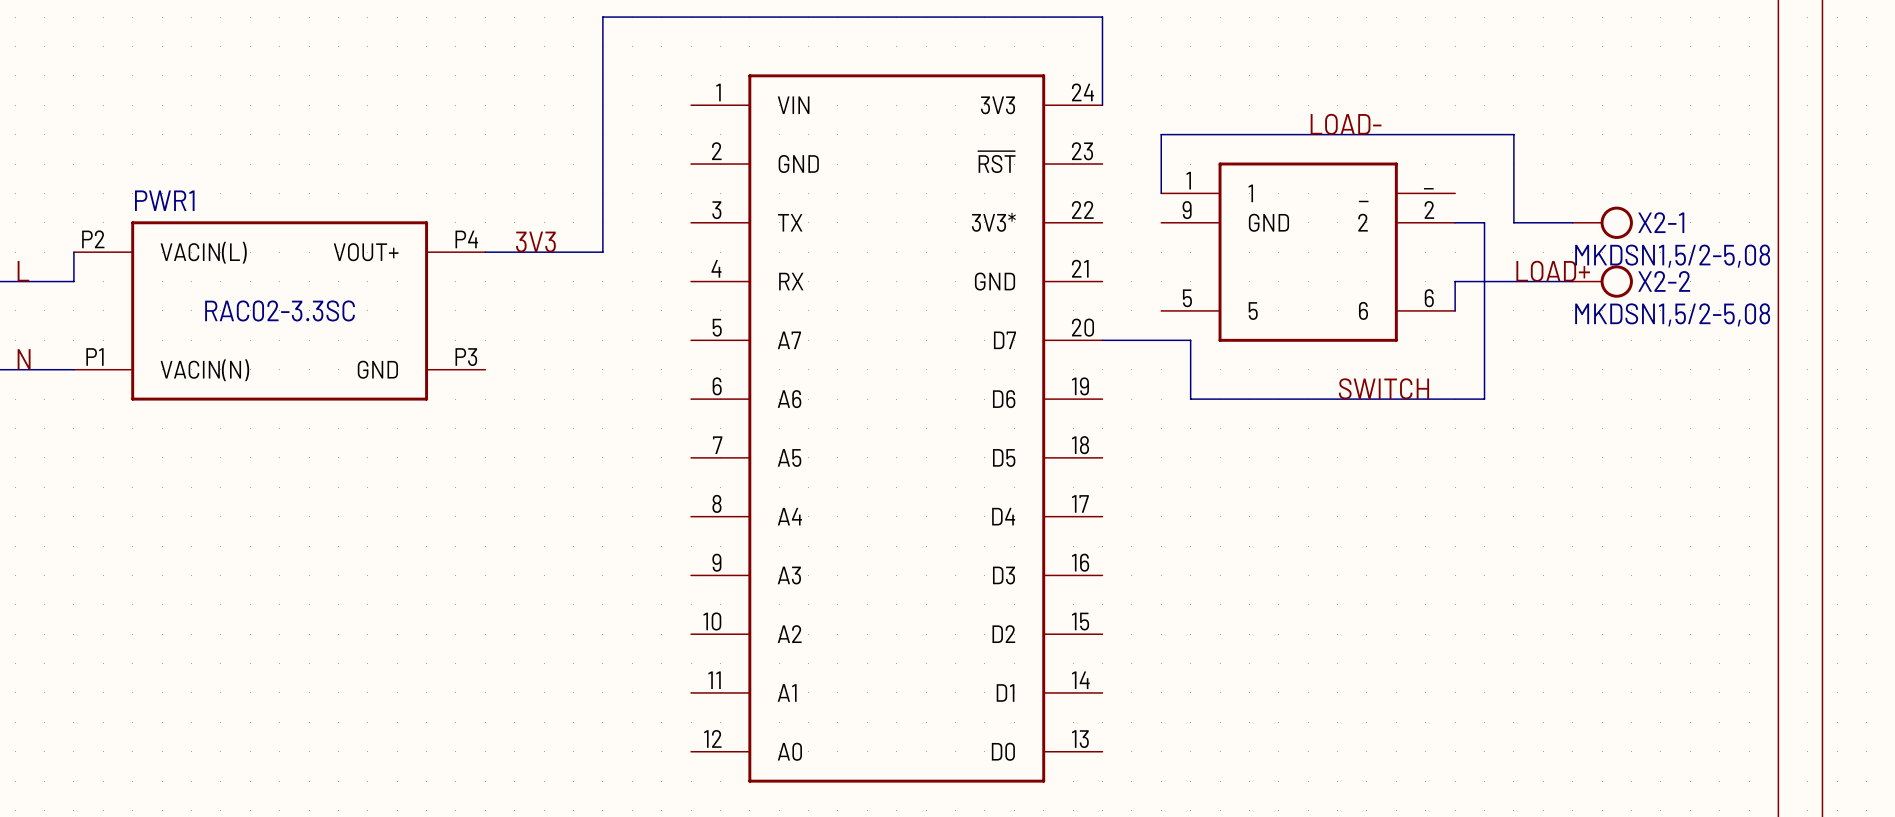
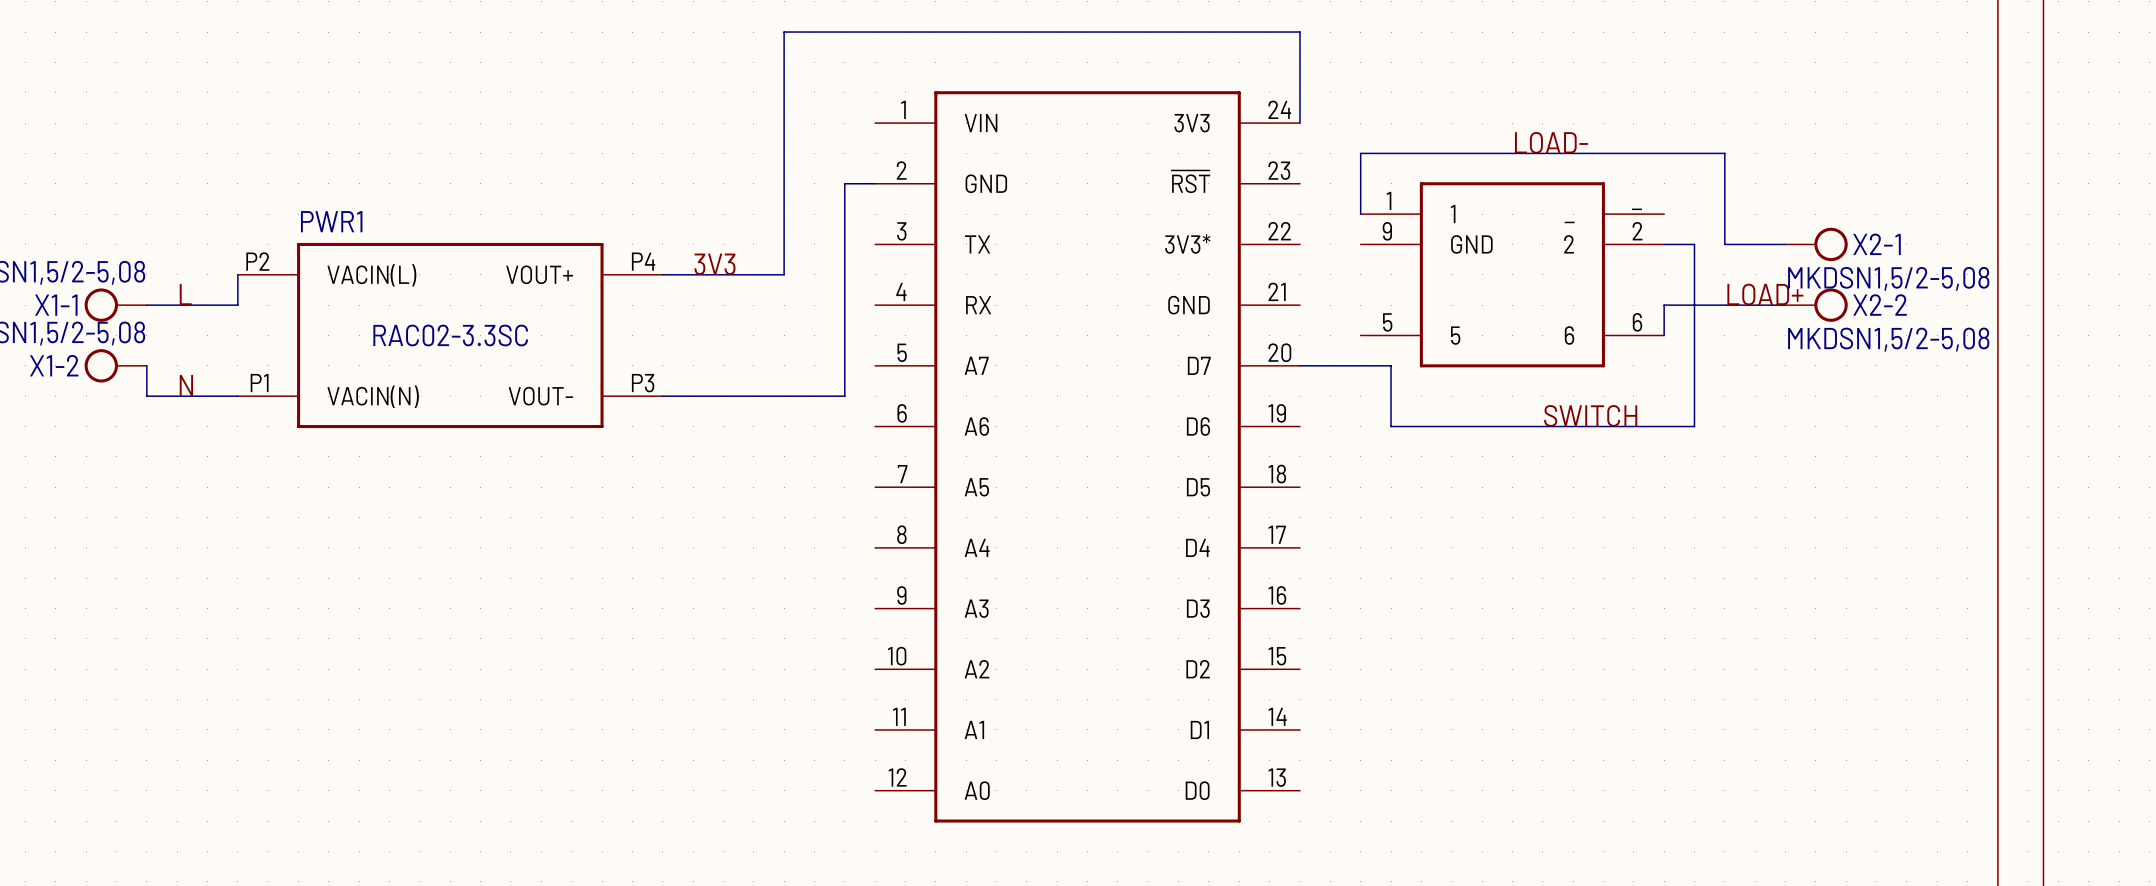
wire: none -> (875, 183) (844, 183) (844, 396) (662, 396)
PWR1 pin name: GND (377, 369) -> VOUT- (540, 396)

